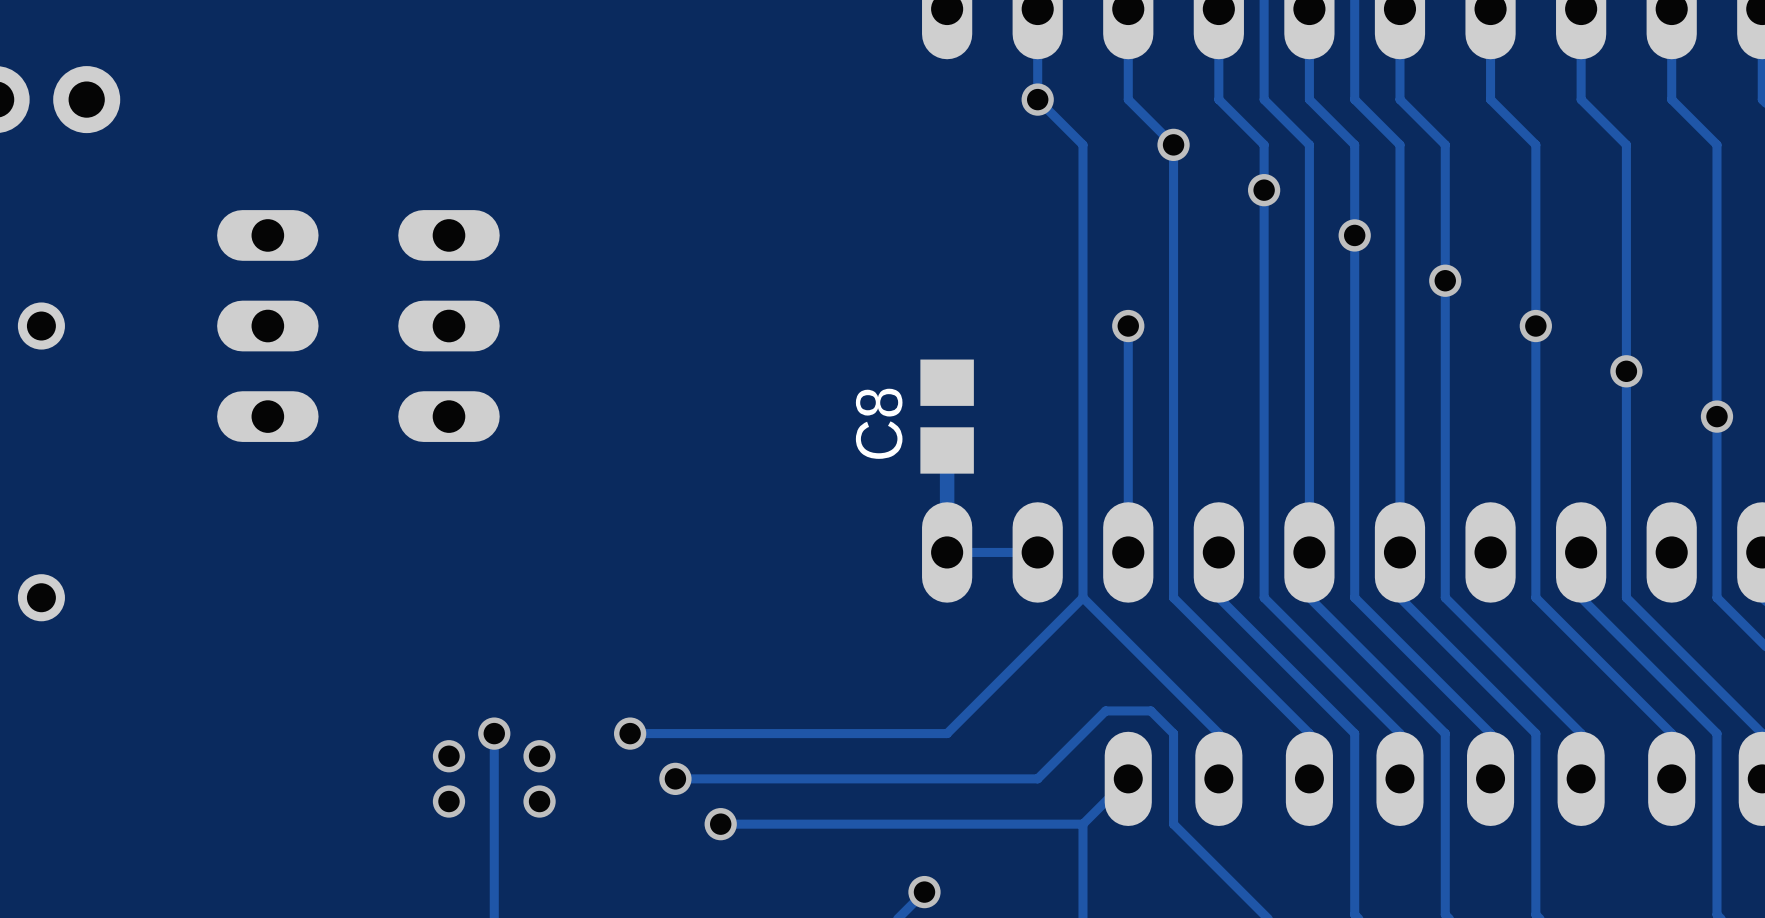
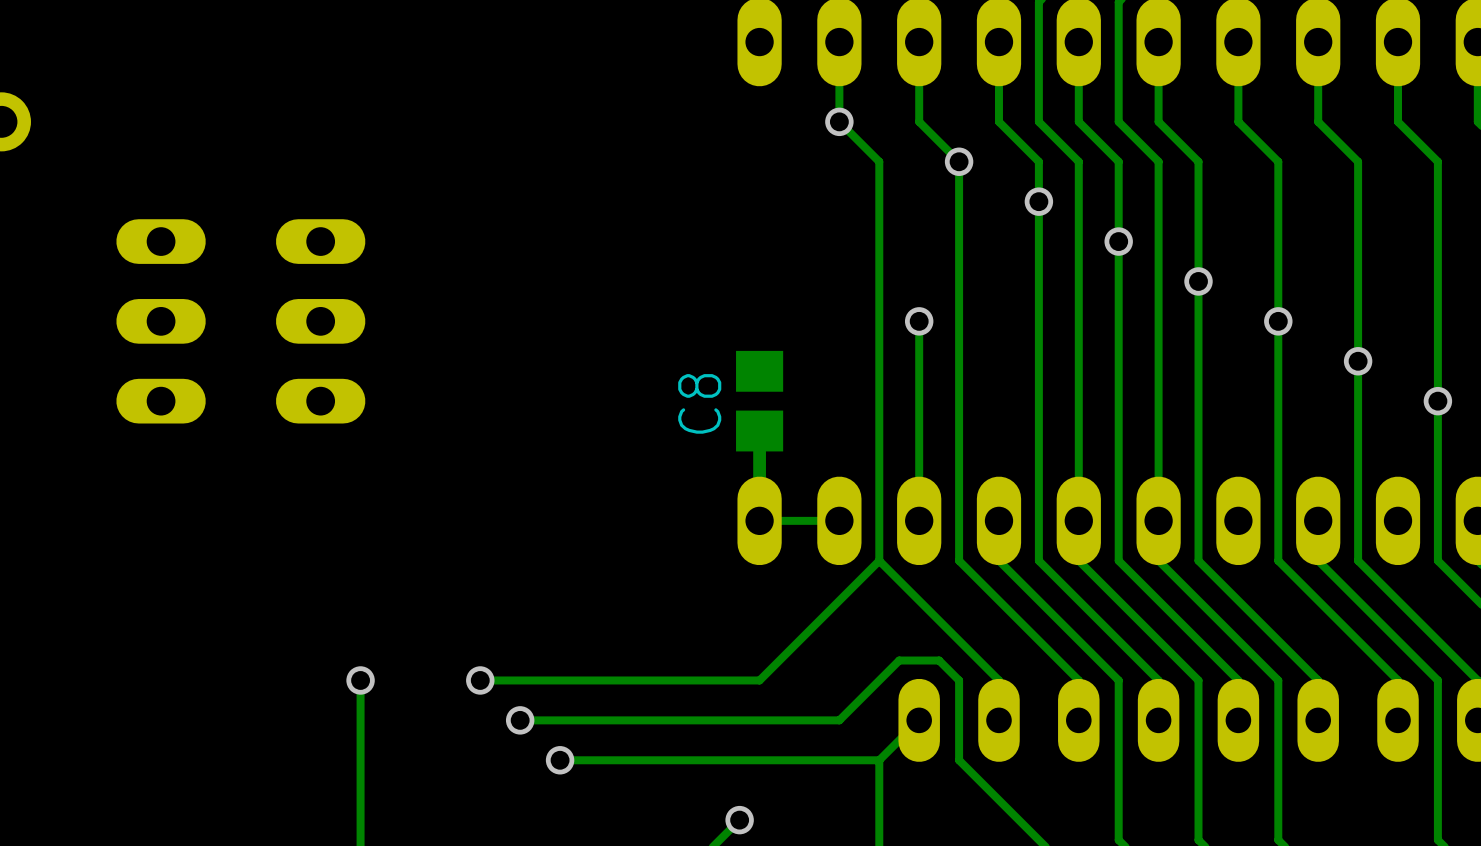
via: (448, 756) -> none
via: (539, 756) -> none
via: (448, 801) -> none
via: (539, 801) -> none

